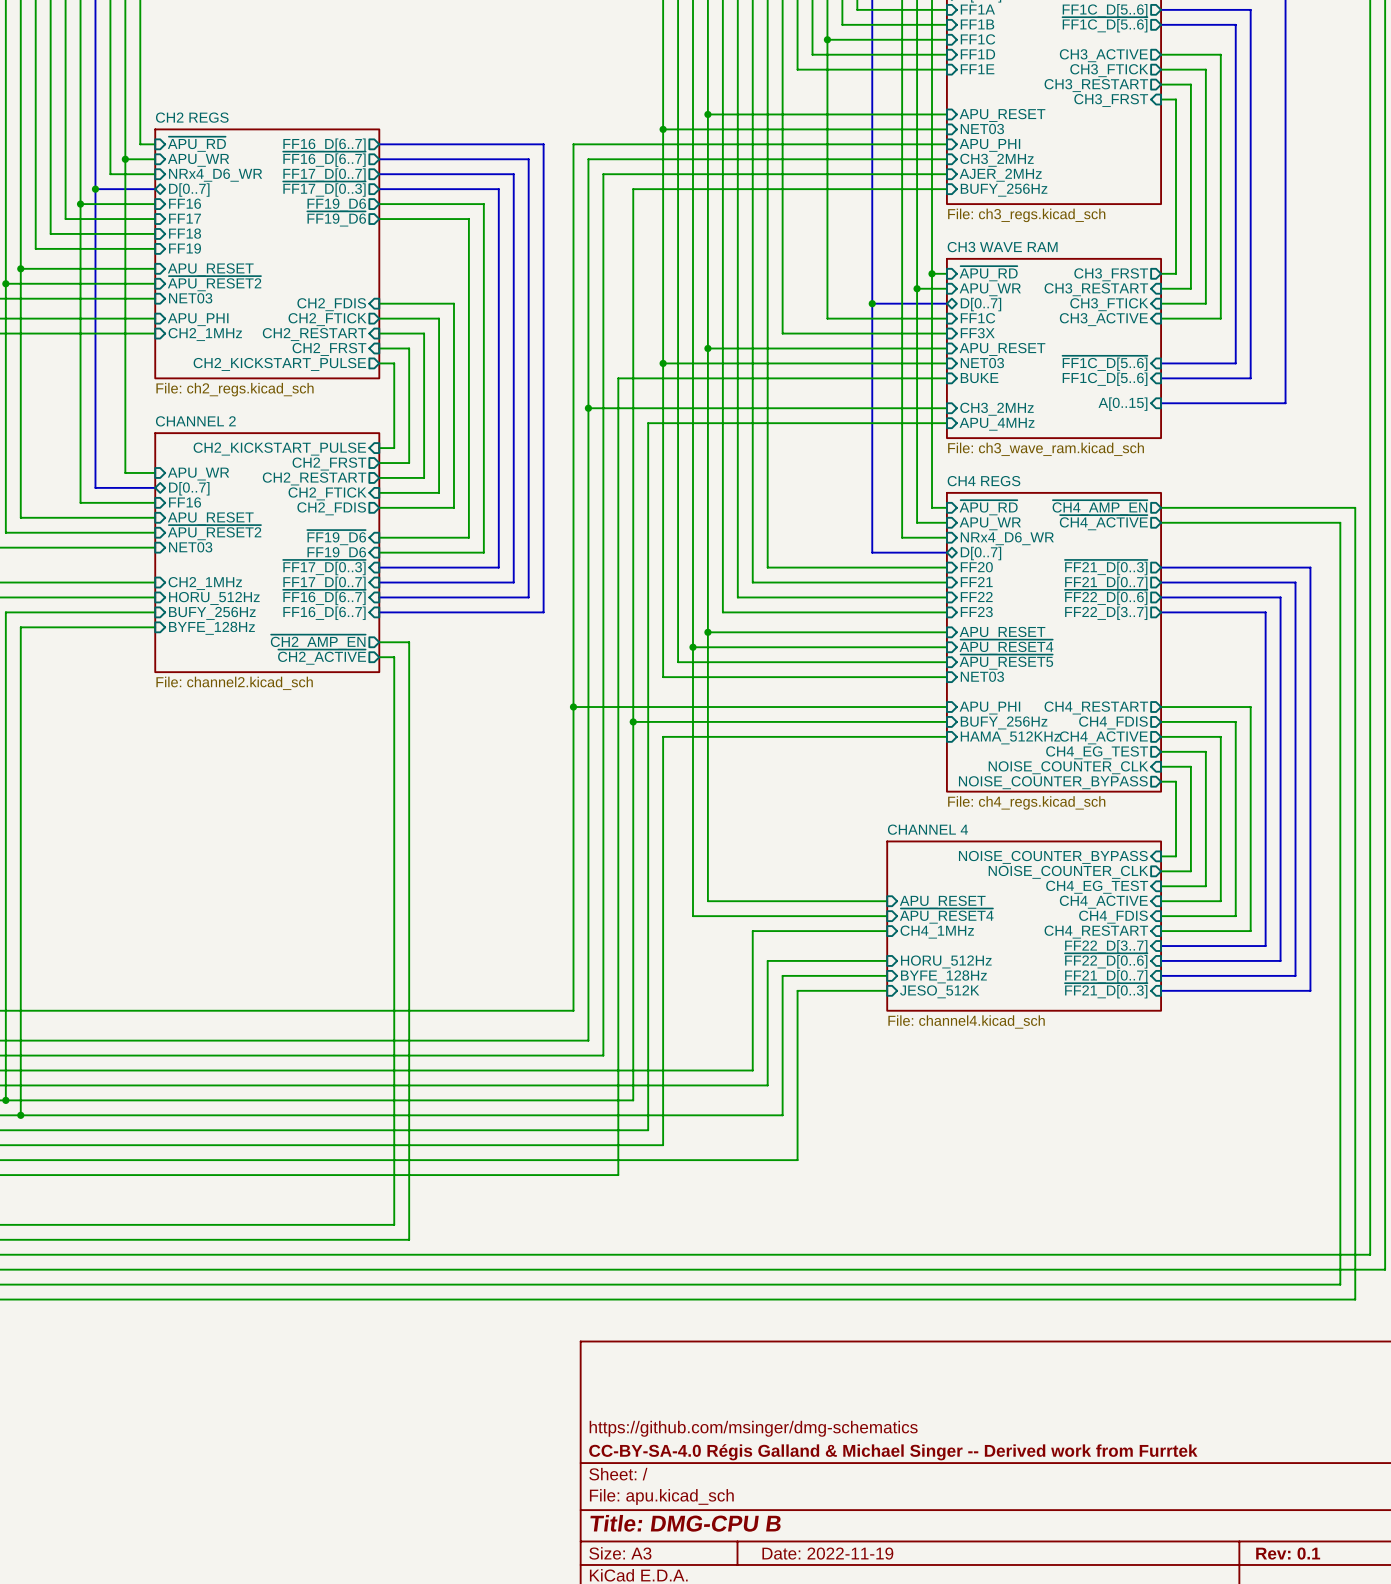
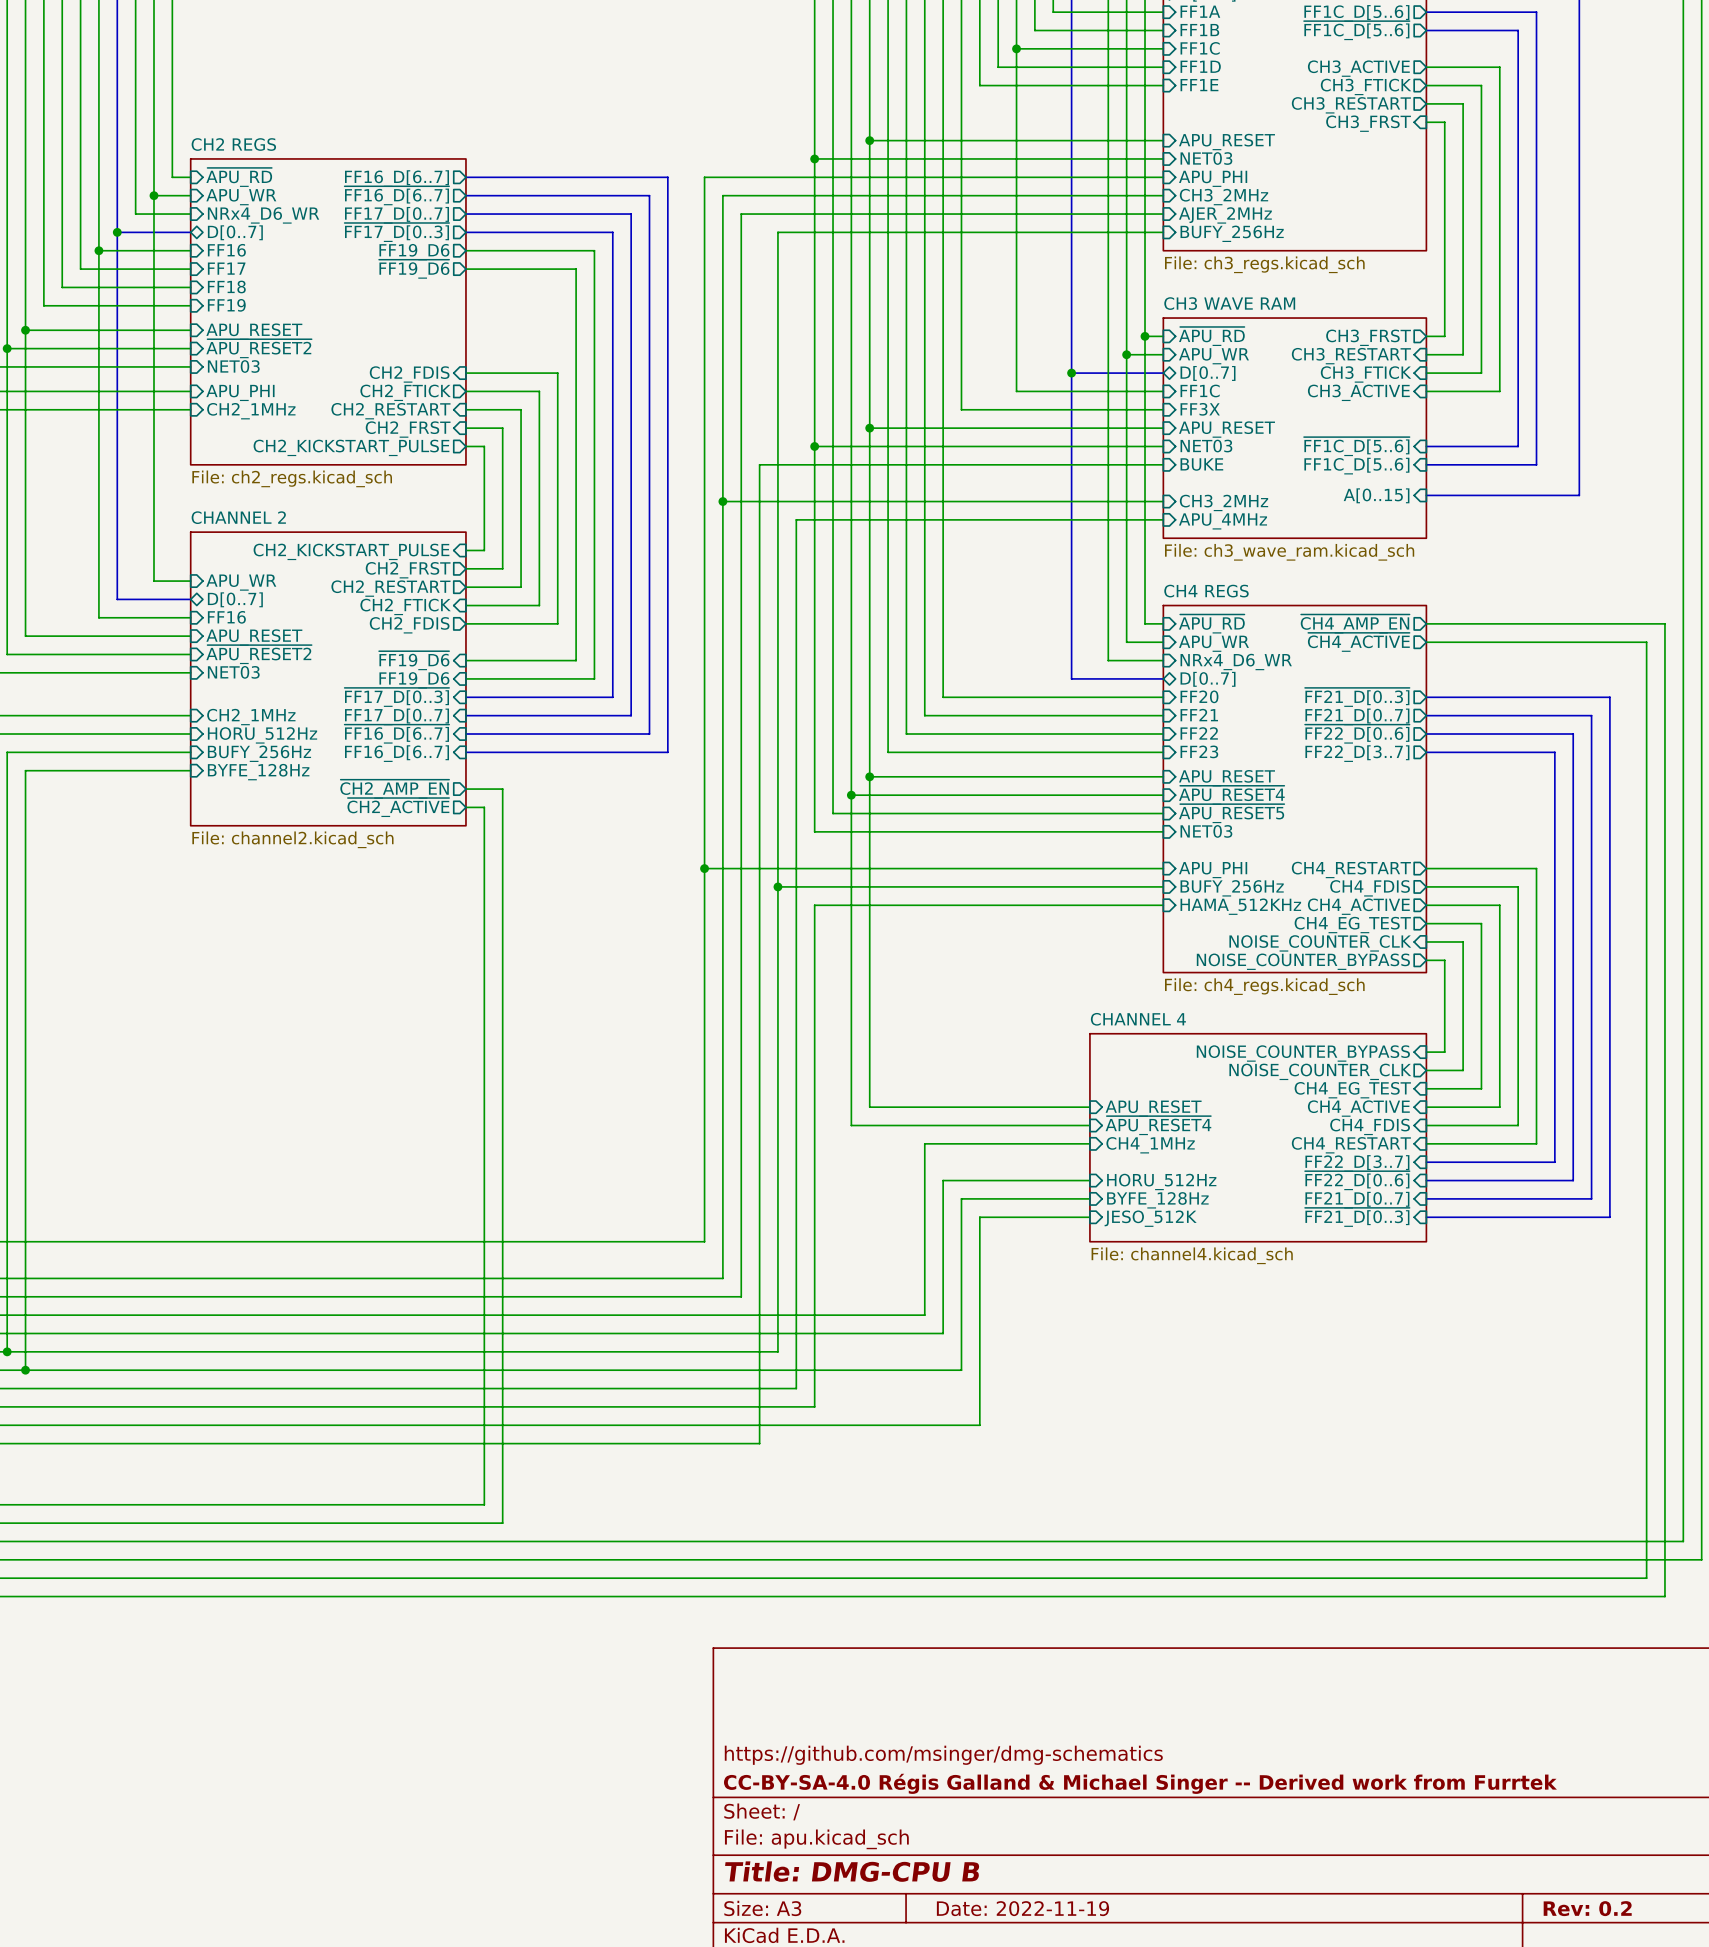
title block: Rev: 0.1 (1288, 1553) -> Rev: 0.2 (1587, 1908)

